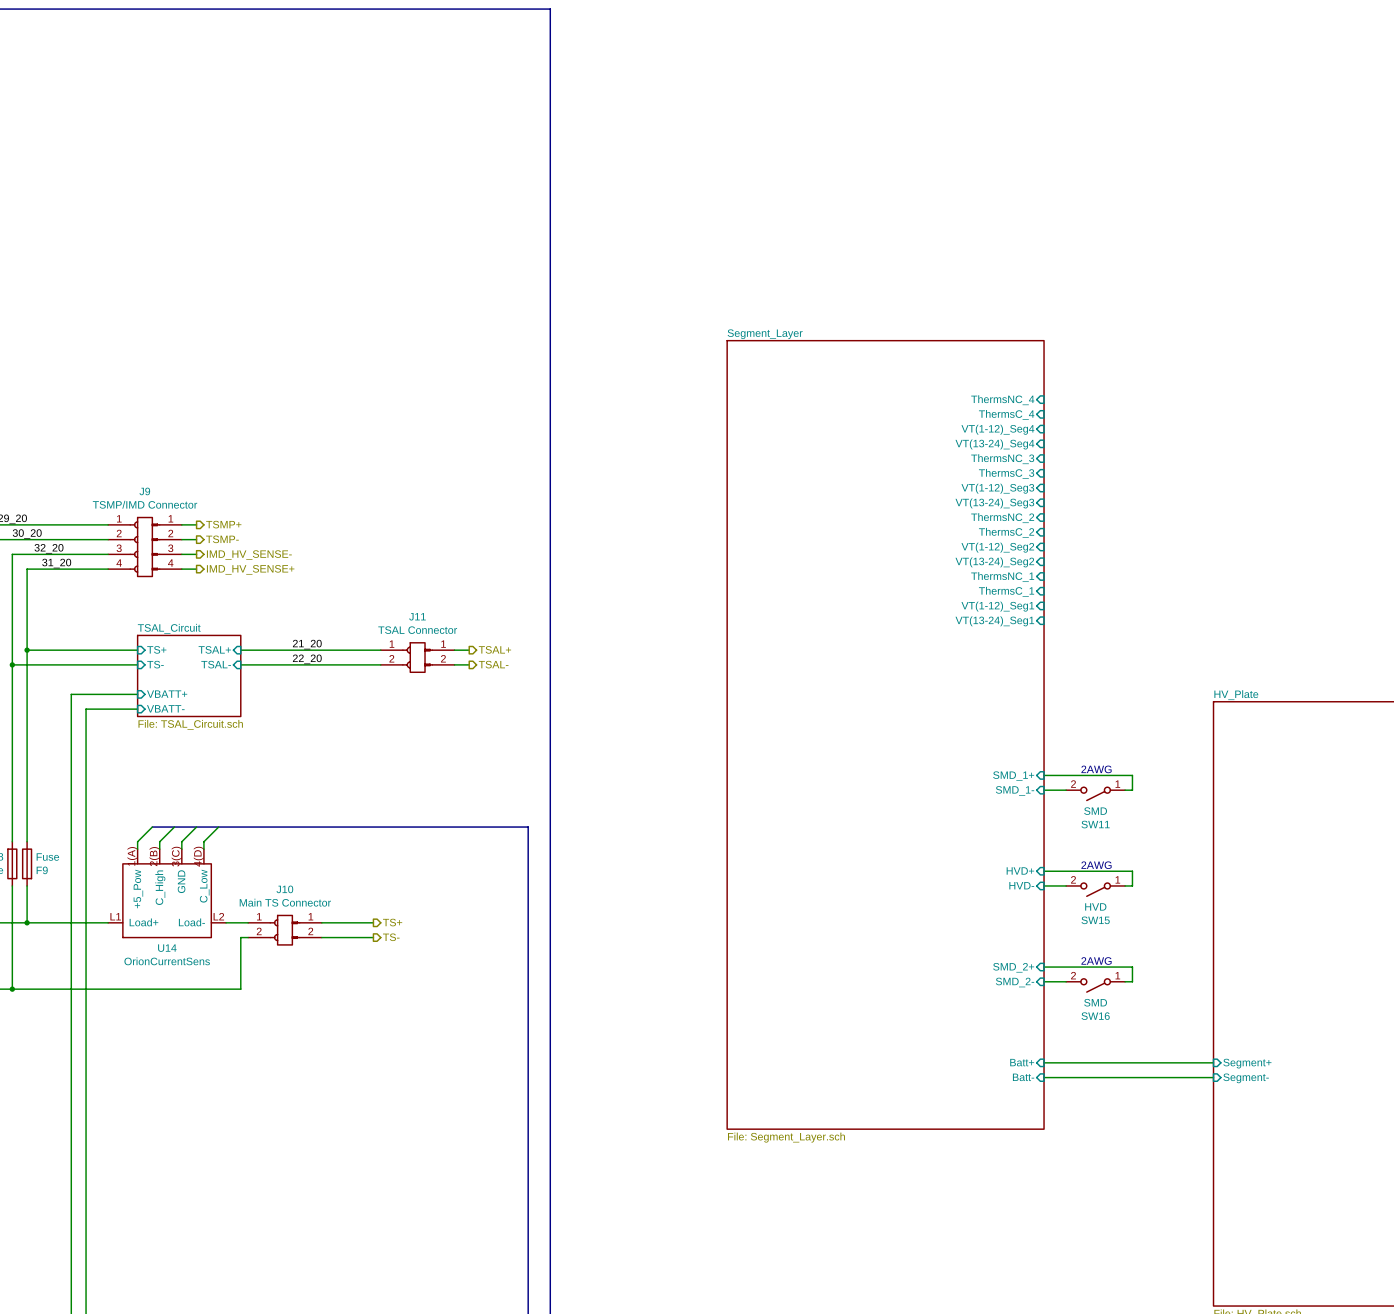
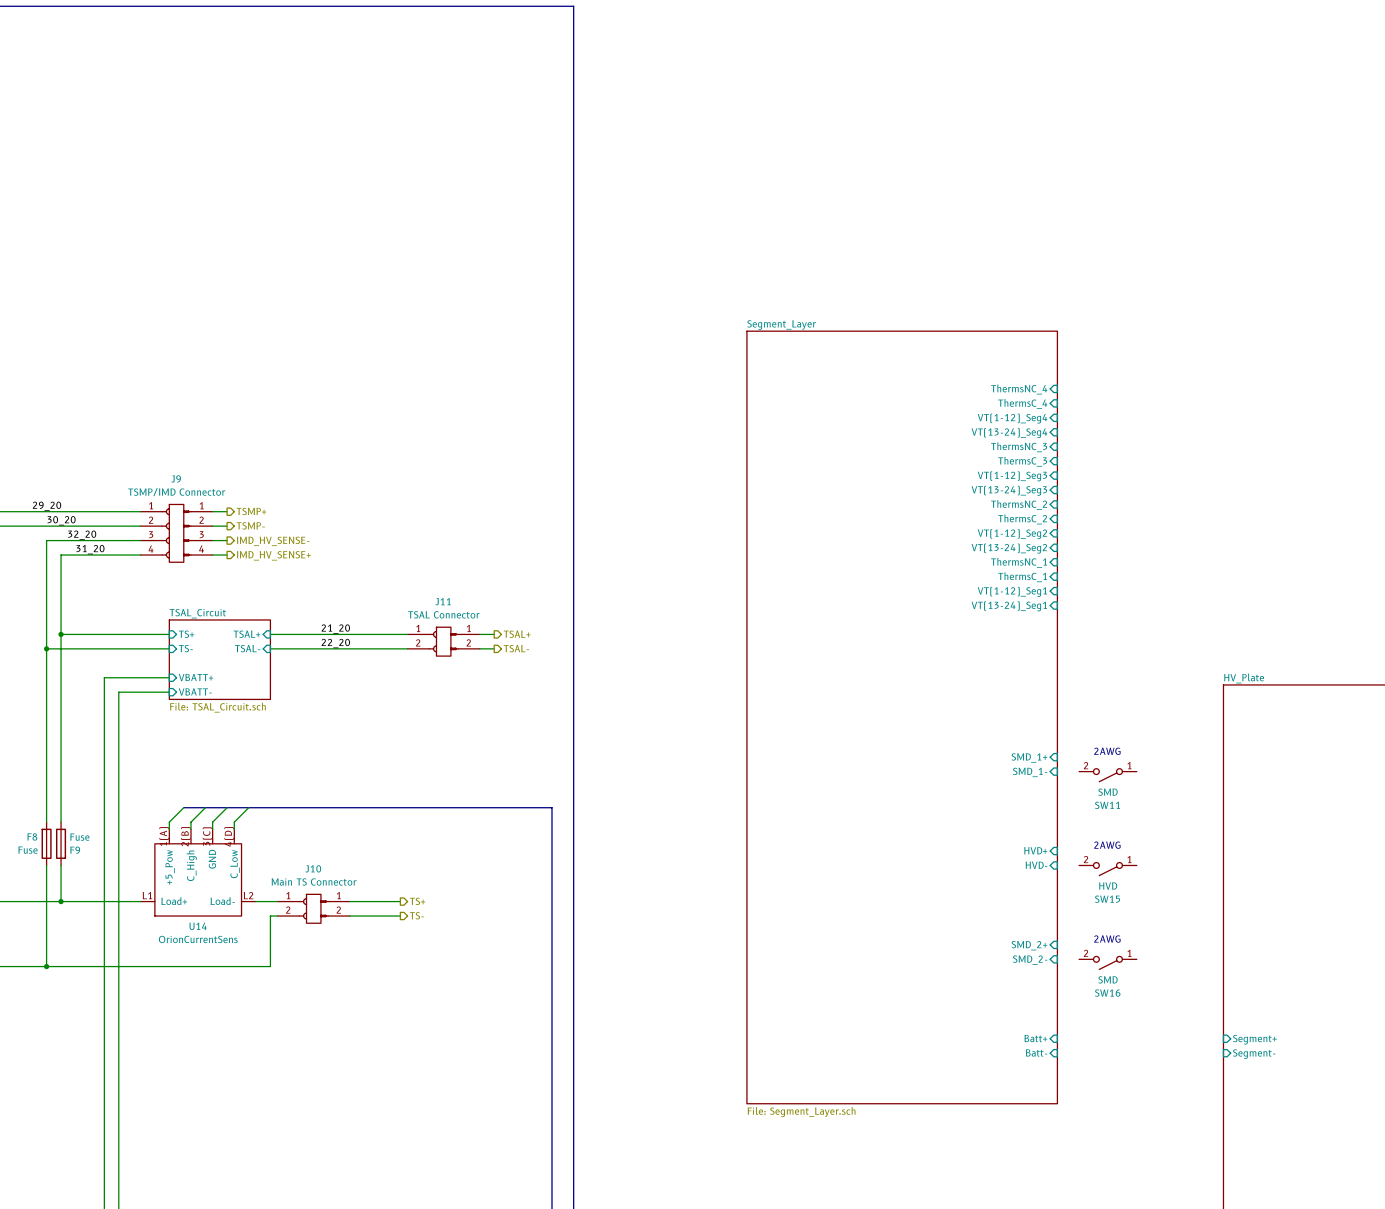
wire: (1044, 775) (1132, 775) (1132, 790) (1125, 790) -> none
wire: (1044, 790) (1066, 790) -> none
wire: (1044, 871) (1132, 871) (1132, 885) (1125, 885) -> none
wire: (1044, 885) (1066, 885) -> none
wire: (1044, 967) (1132, 967) (1132, 981) (1125, 981) -> none
wire: (1044, 981) (1066, 981) -> none
wire: (1044, 1062) (1213, 1062) -> none
wire: (1044, 1077) (1213, 1077) -> none

